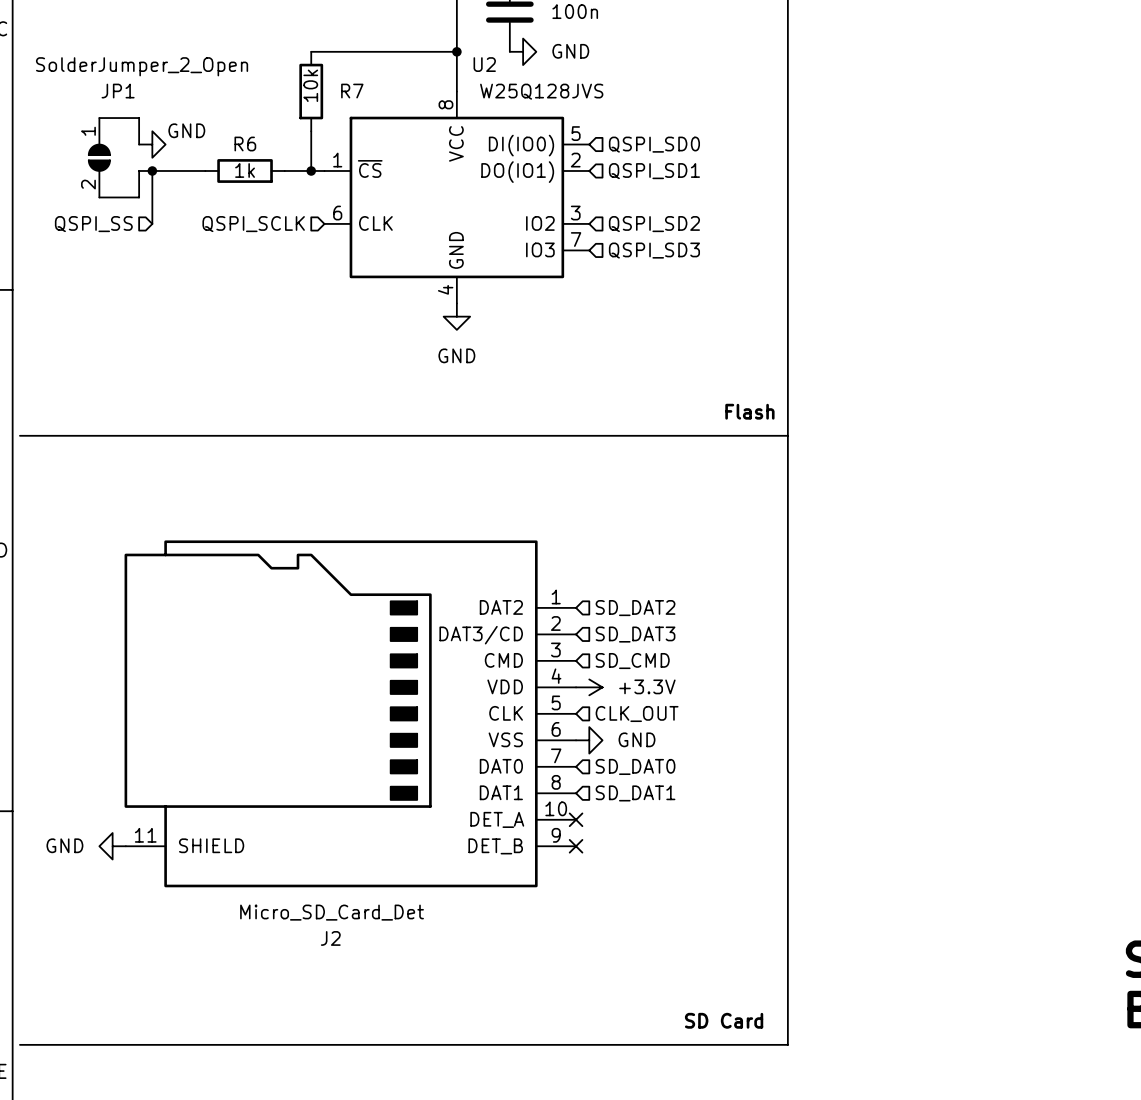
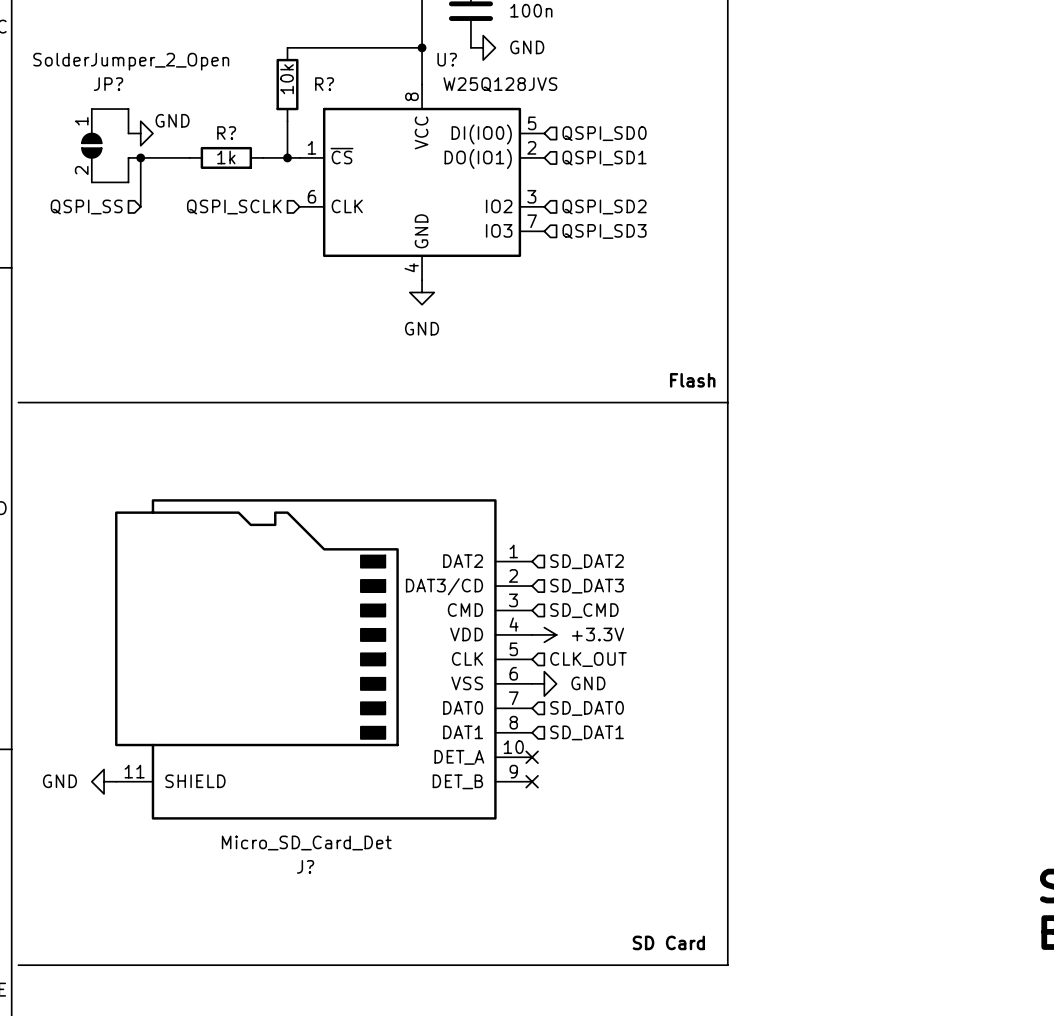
U2 name: U2 (484, 64) -> U? (447, 59)
JP1 name: JP1 (118, 91) -> JP? (108, 84)
R7 name: R7 (352, 91) -> R? (324, 84)
R6 name: R6 (245, 144) -> R? (226, 133)
J2 name: J2 (330, 938) -> J? (305, 866)

